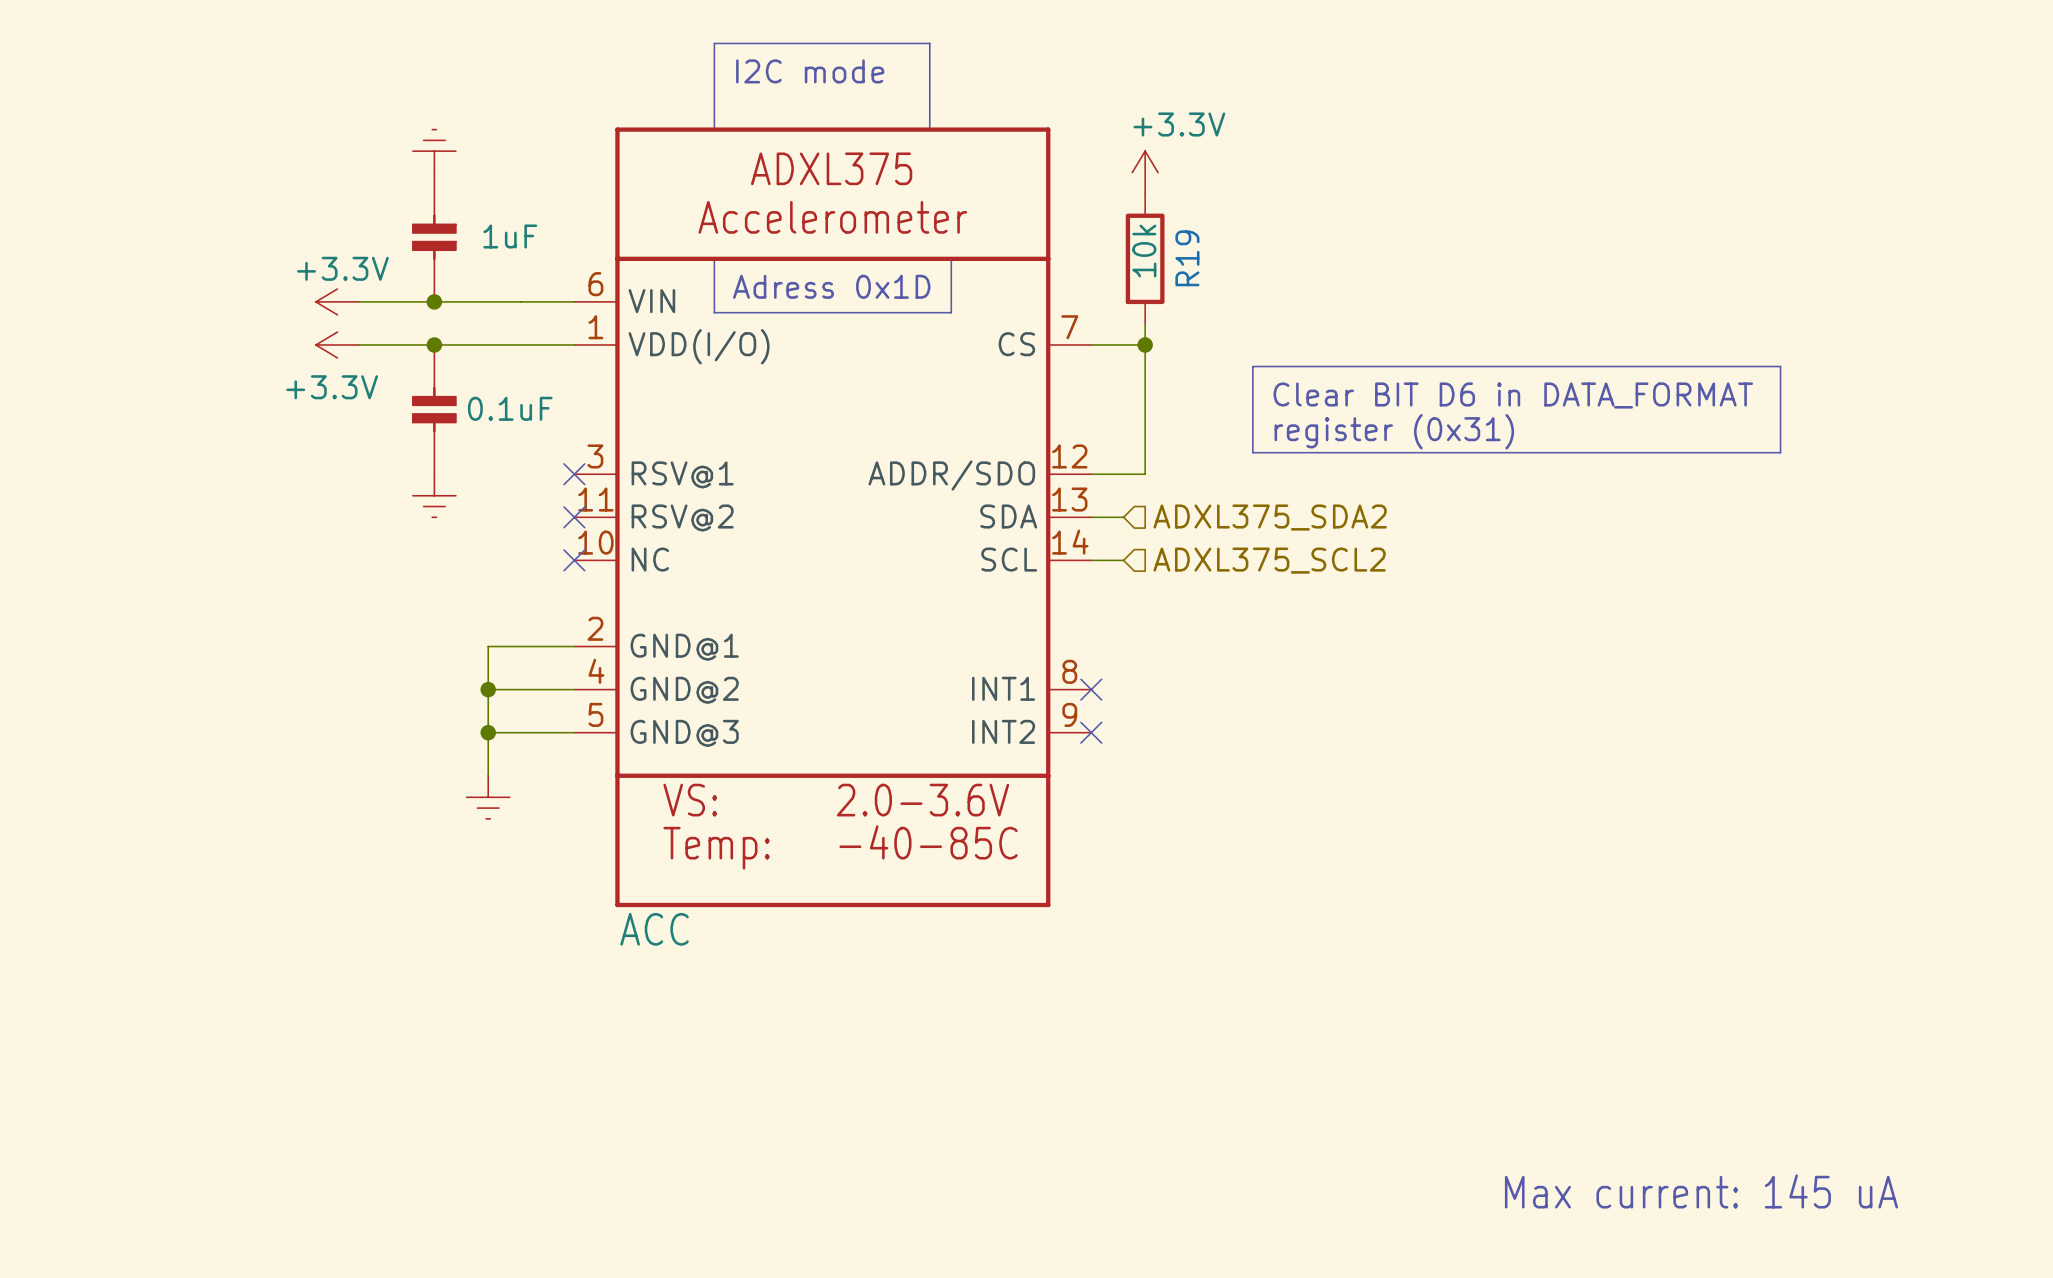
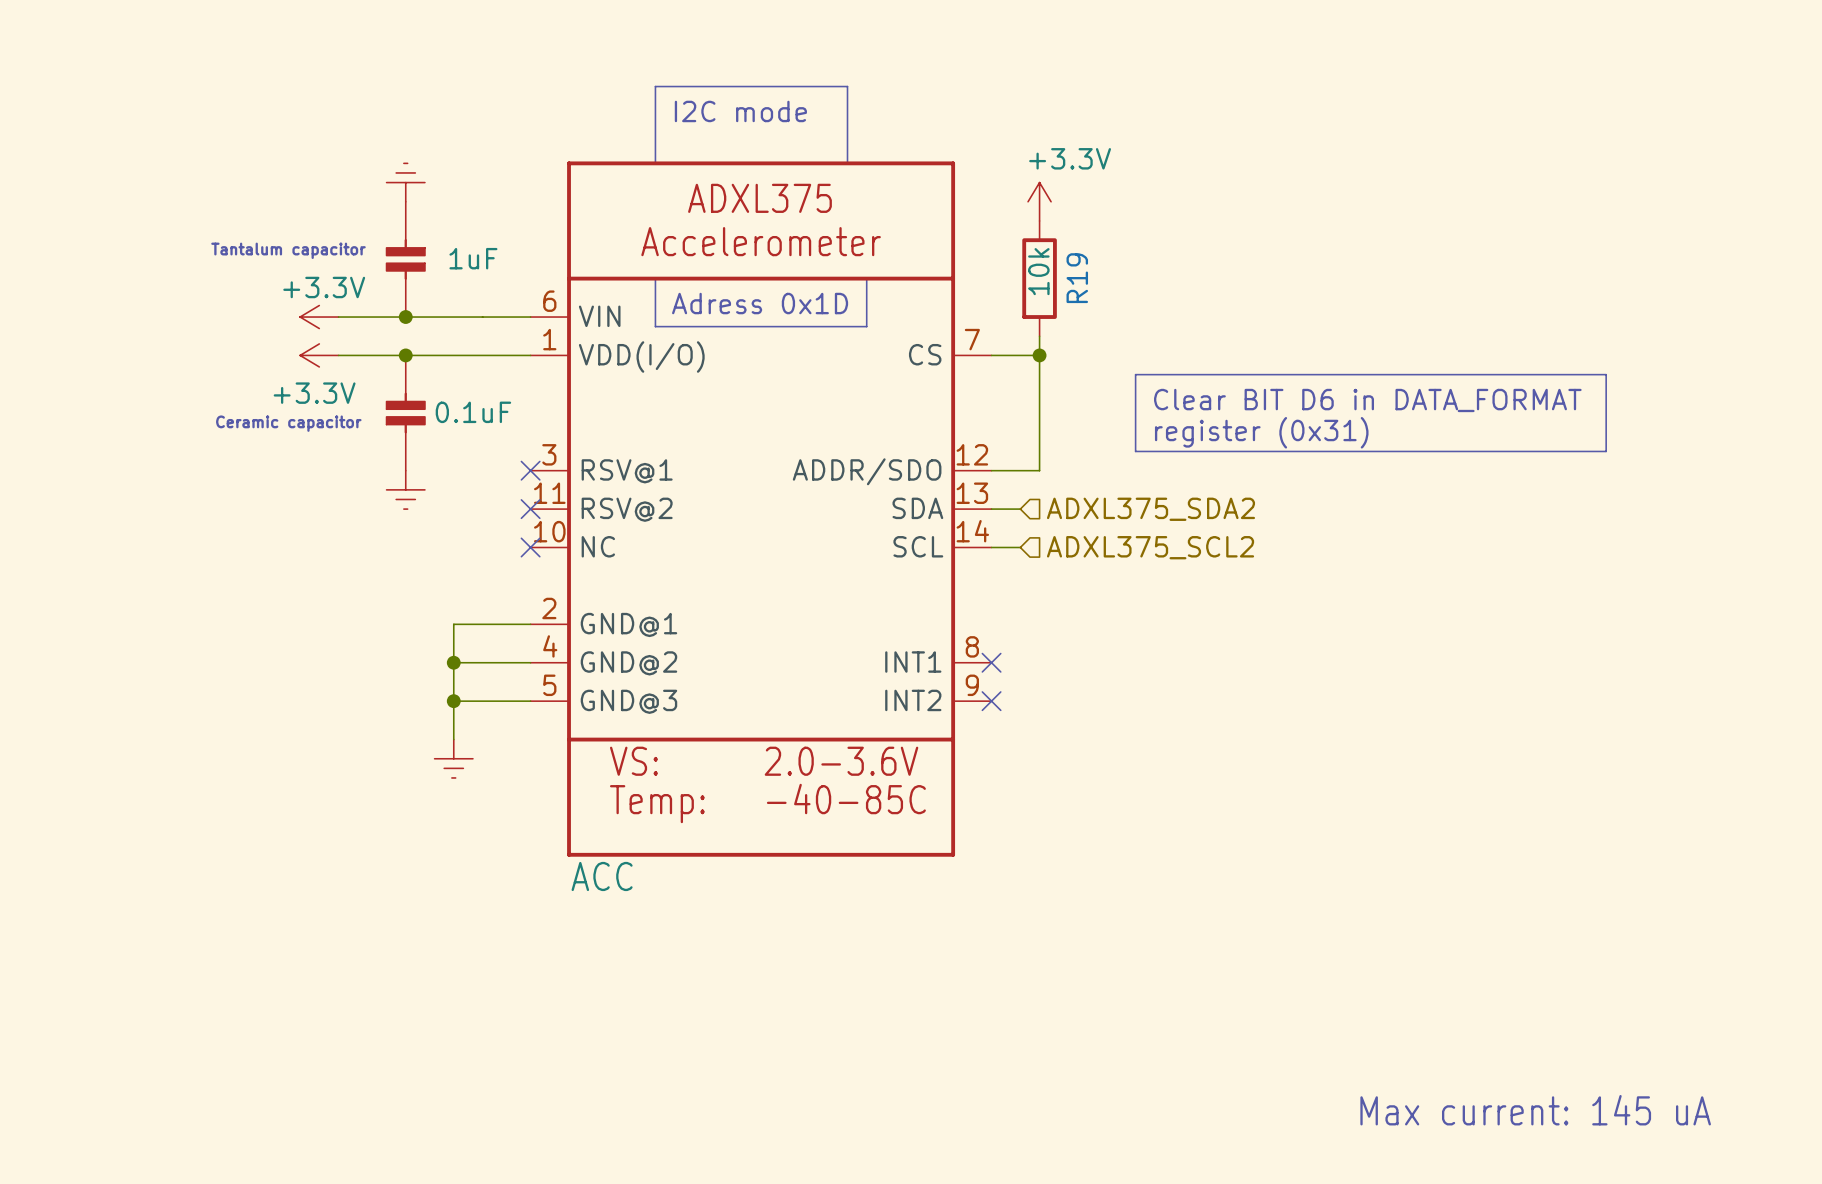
text: none -> Tantalum capacitor (288, 250)
text: none -> Ceramic capacitor (288, 423)

